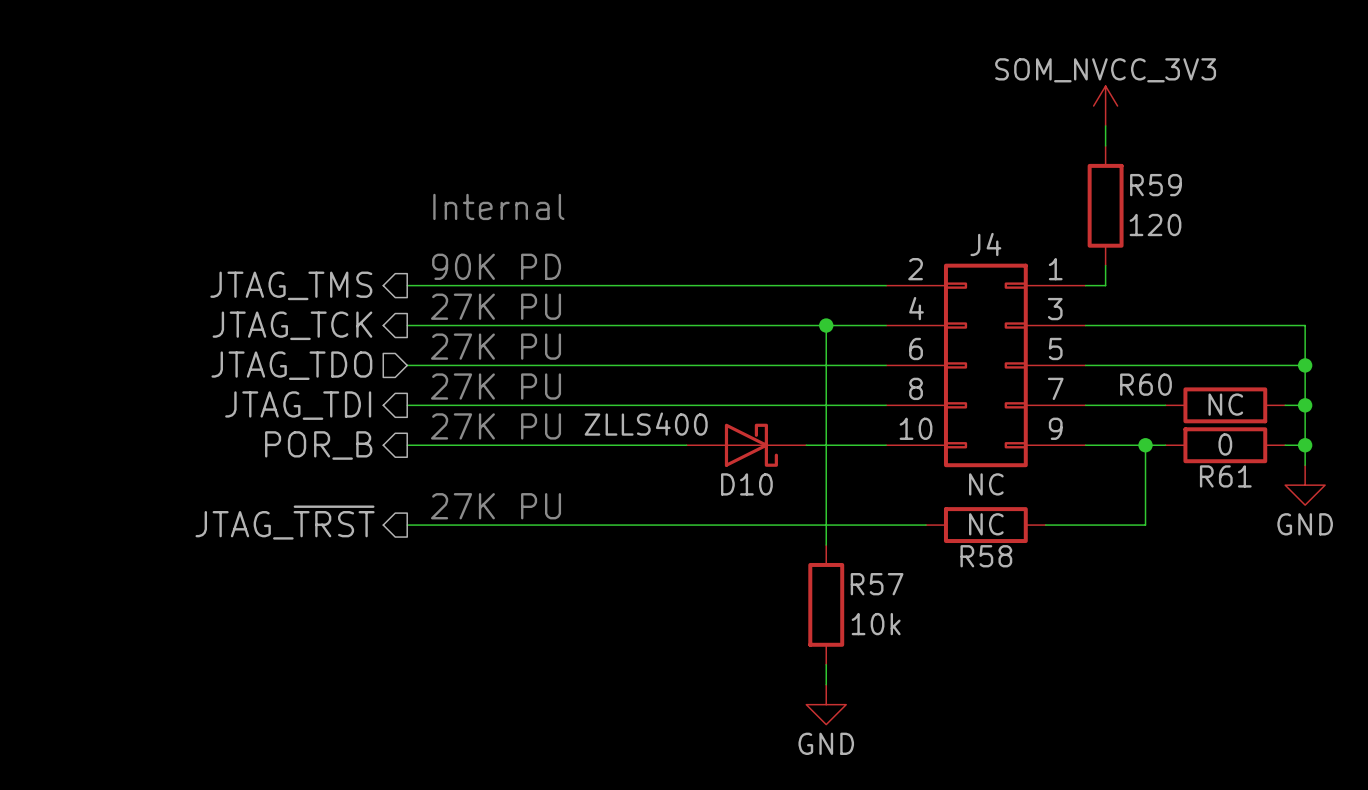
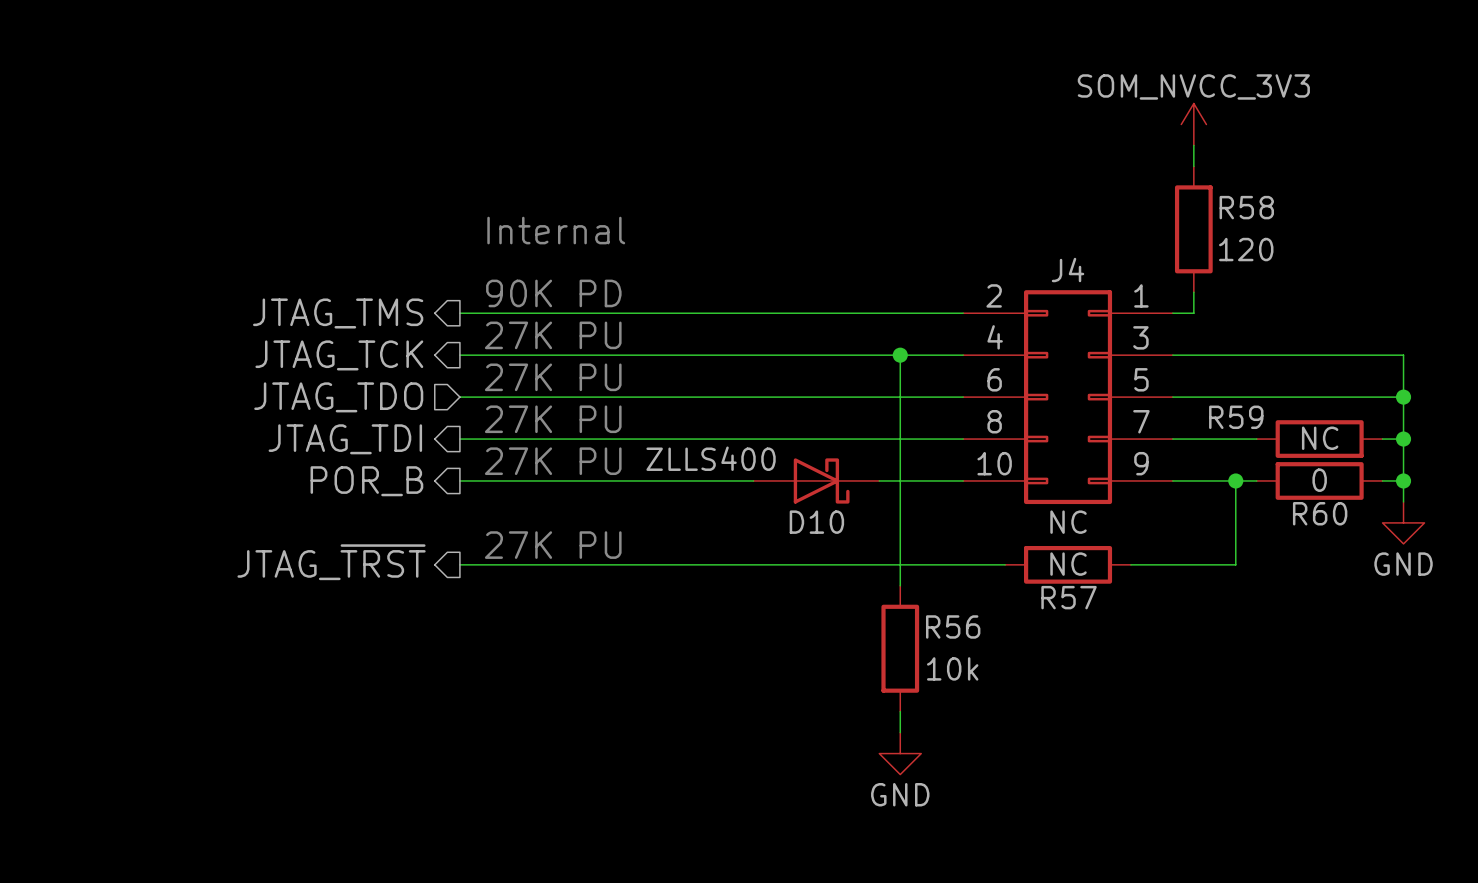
R59 name: R59 (1155, 185) -> R58 (1246, 207)
R60 name: R60 (1145, 384) -> R59 (1236, 417)
R61 name: R61 (1225, 476) -> R60 (1320, 513)
R58 name: R58 (986, 556) -> R57 (1069, 597)
R57 name: R57 (877, 584) -> R56 (953, 626)

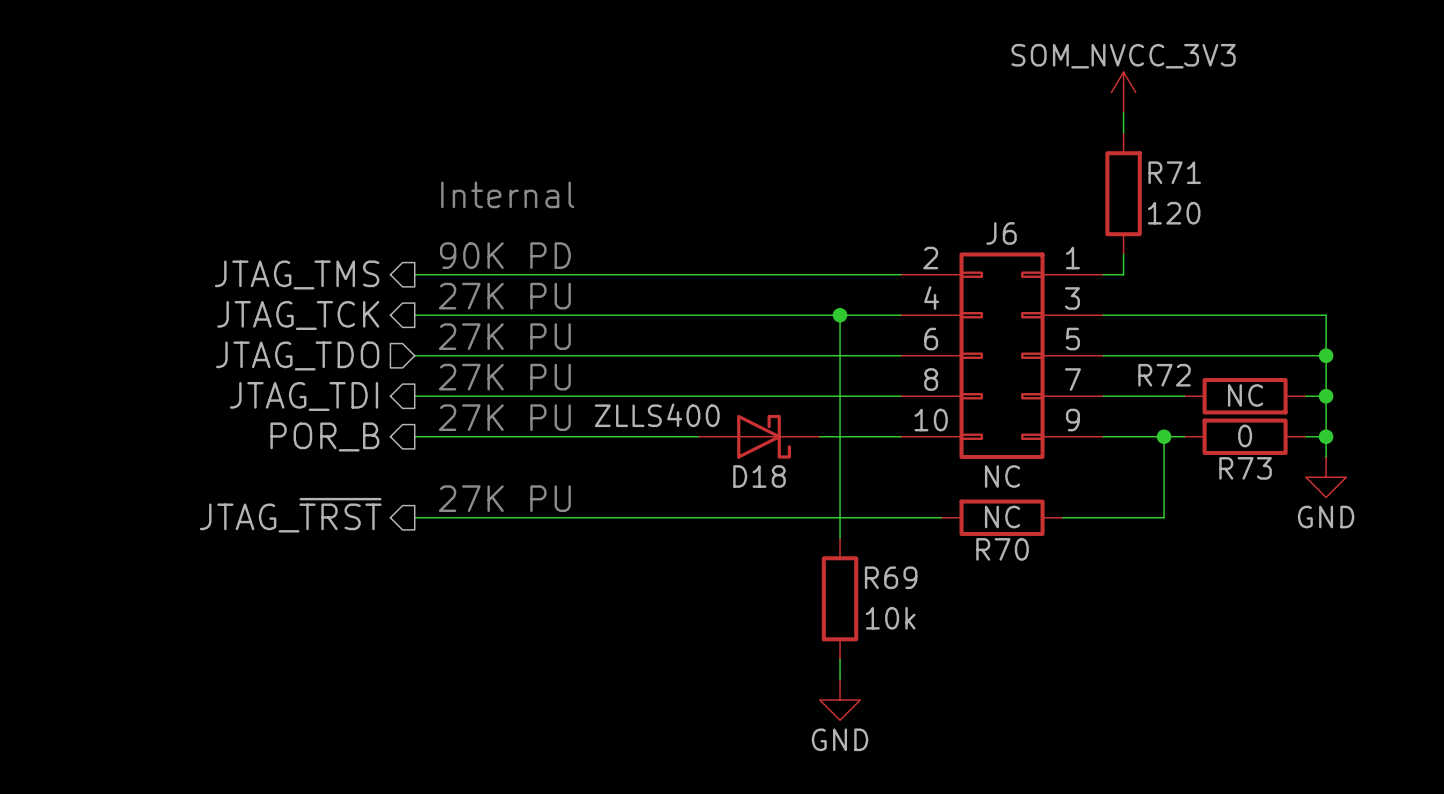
R58 name: R58 (1246, 207) -> R71 (1174, 172)
J4 name: J4 (1068, 270) -> J6 (1001, 233)
R59 name: R59 (1236, 417) -> R72 (1164, 375)
R60 name: R60 (1320, 513) -> R73 (1245, 468)
D10 name: D10 (816, 522) -> D18 (759, 476)
R57 name: R57 (1069, 597) -> R70 (1002, 549)
R56 name: R56 (953, 626) -> R69 (891, 577)

